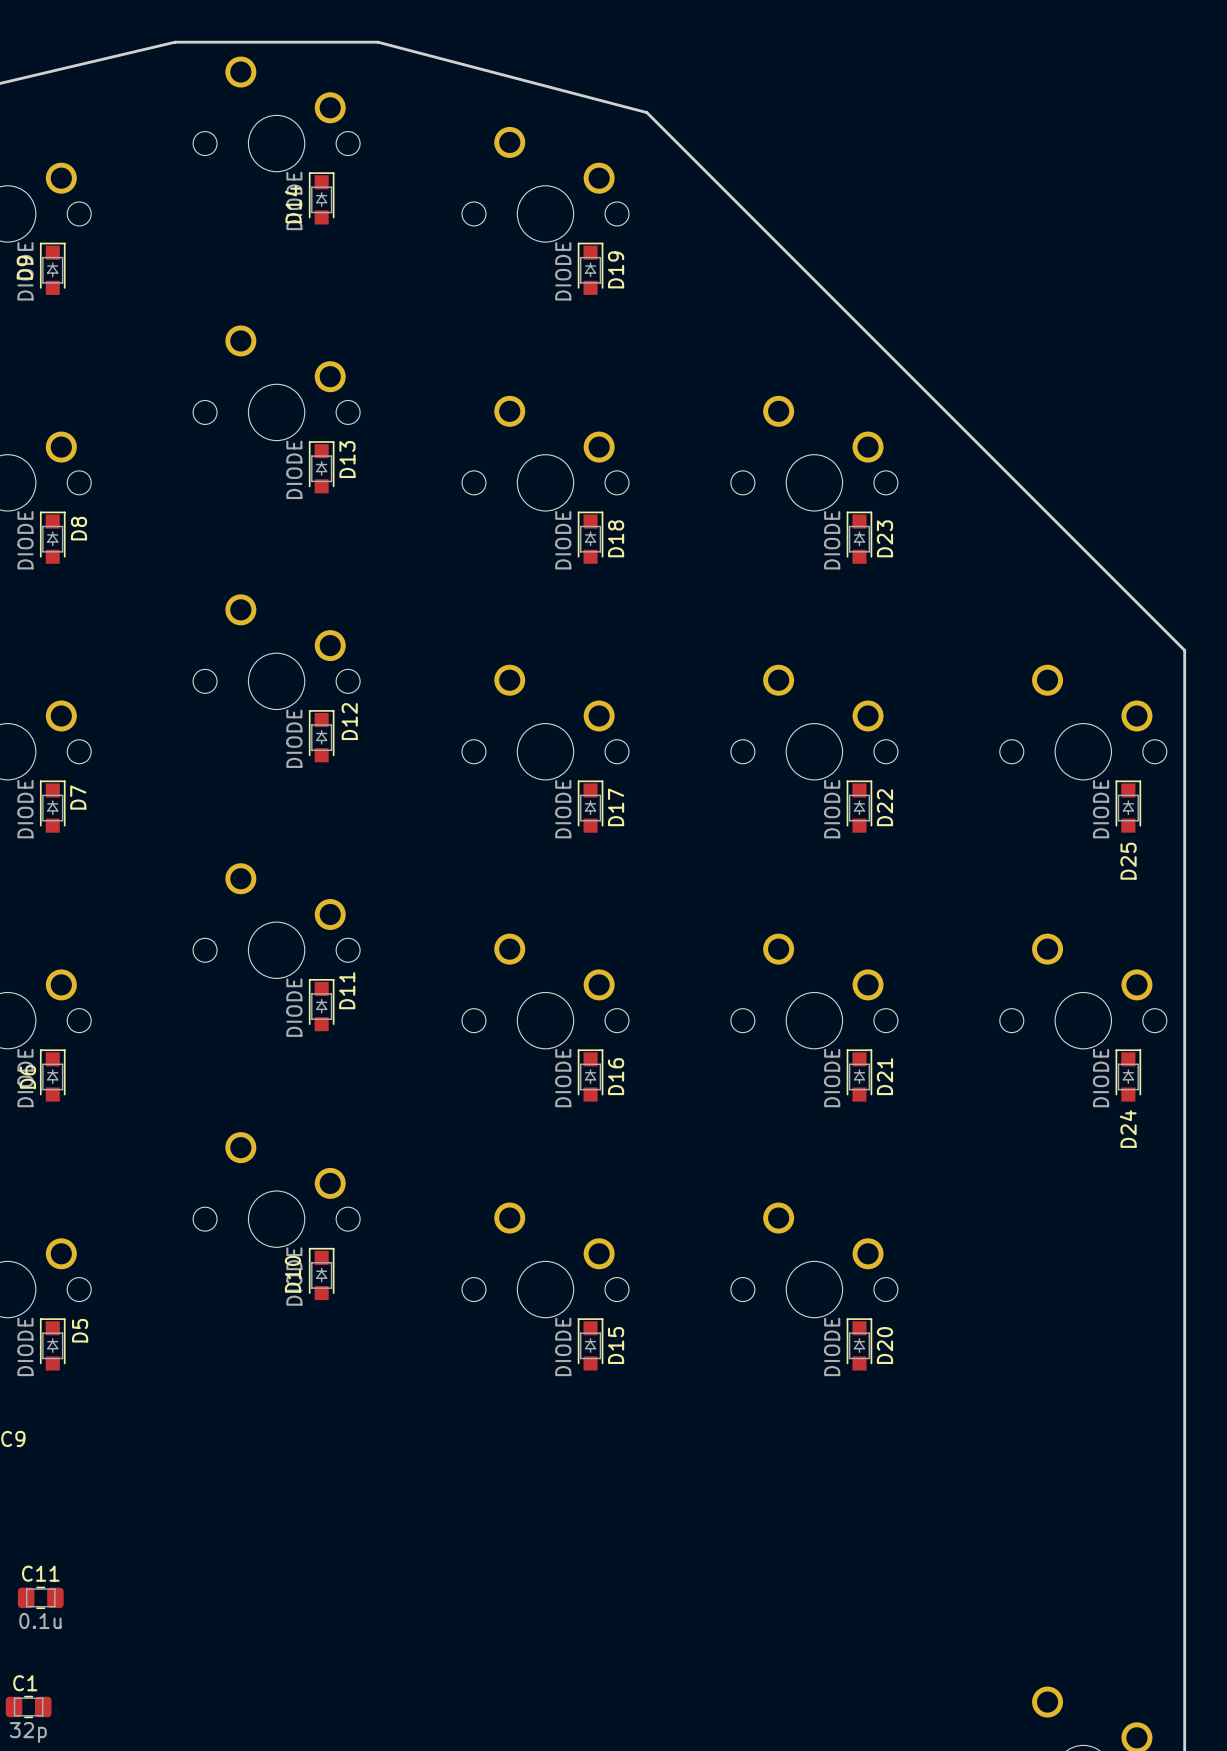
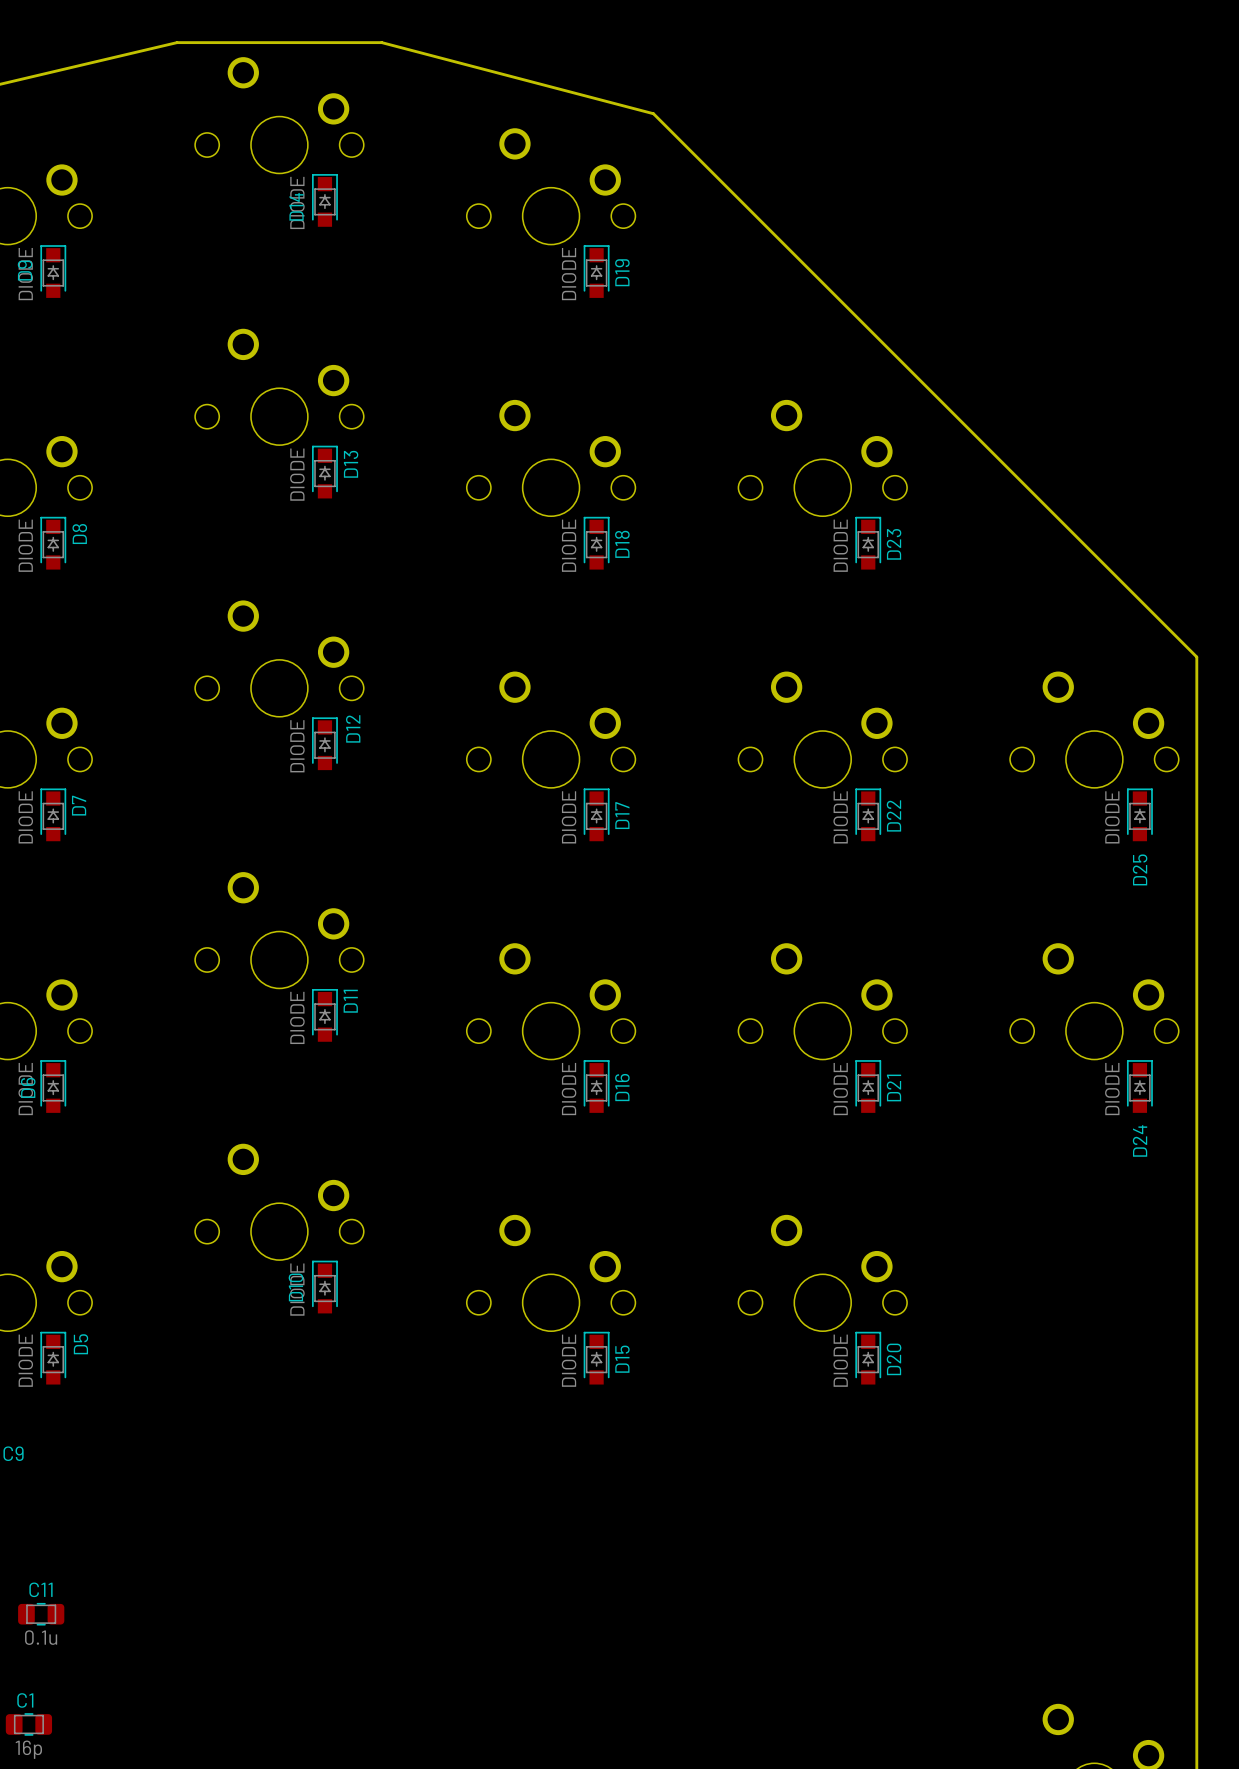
C1 value: 32p (28, 1732) -> 16p (28, 1749)

